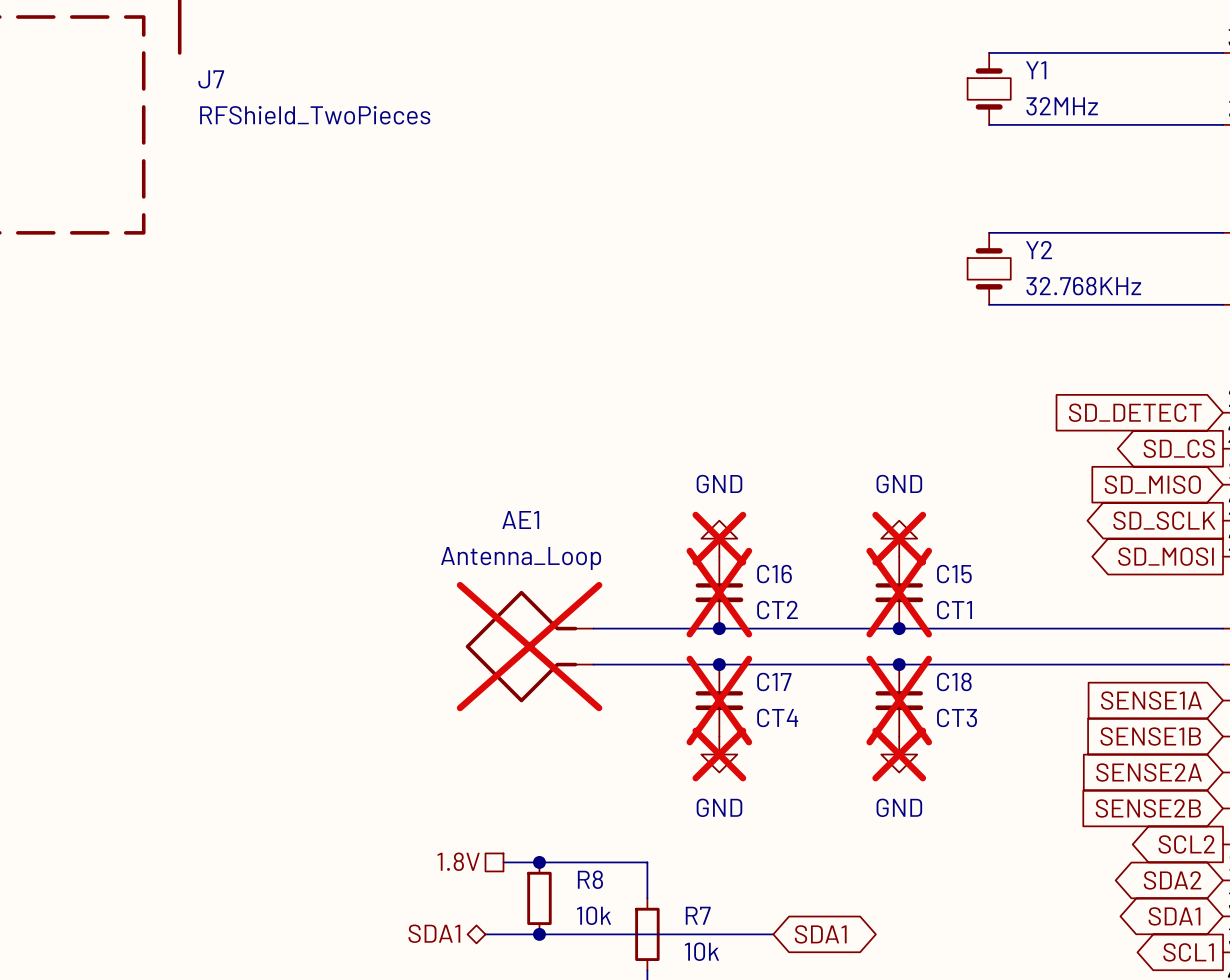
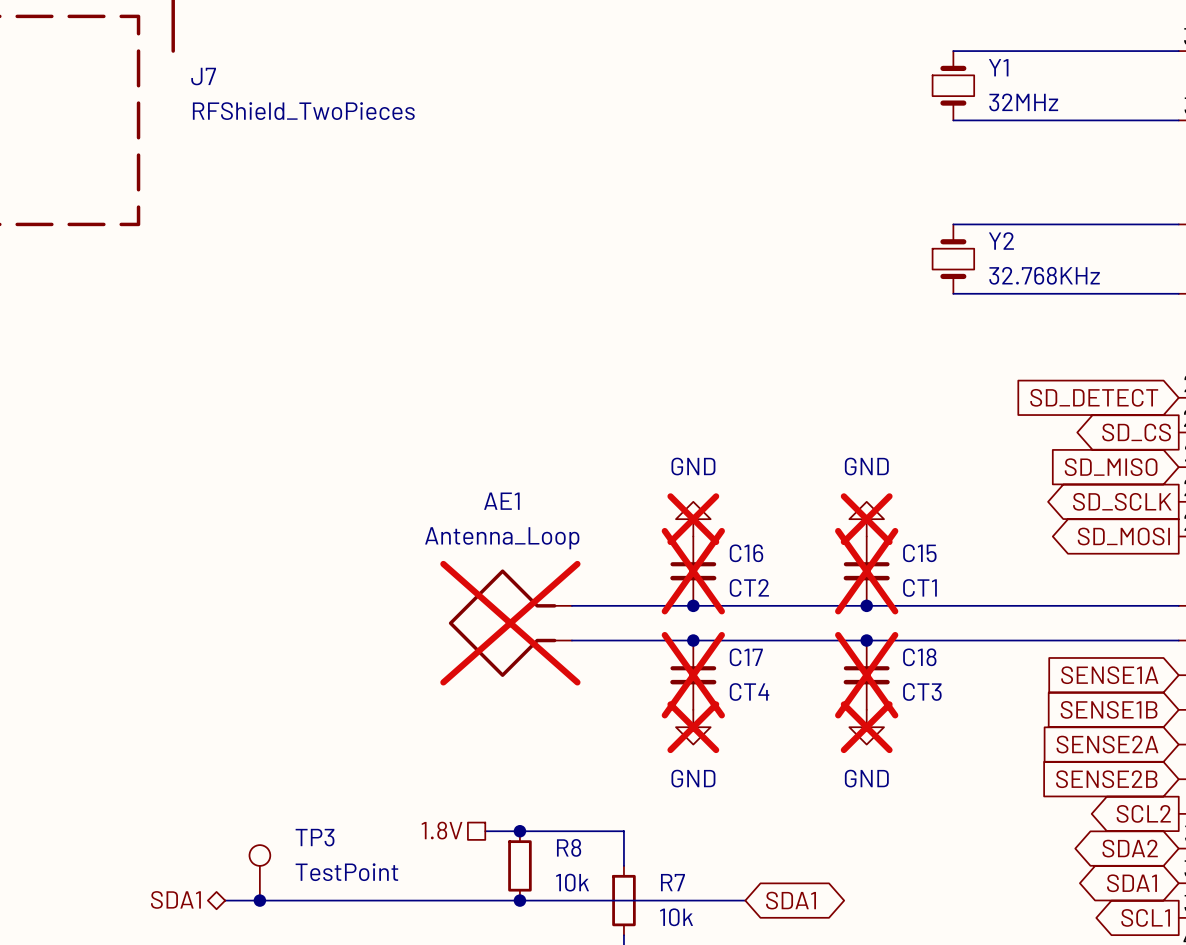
TP3: none -> TestPoint (259, 872)
hierarchical label position: SDA1 (434, 933) -> SDA1 (175, 899)
wire: none -> (225, 900) (467, 900)
junction: none -> (259, 900)

